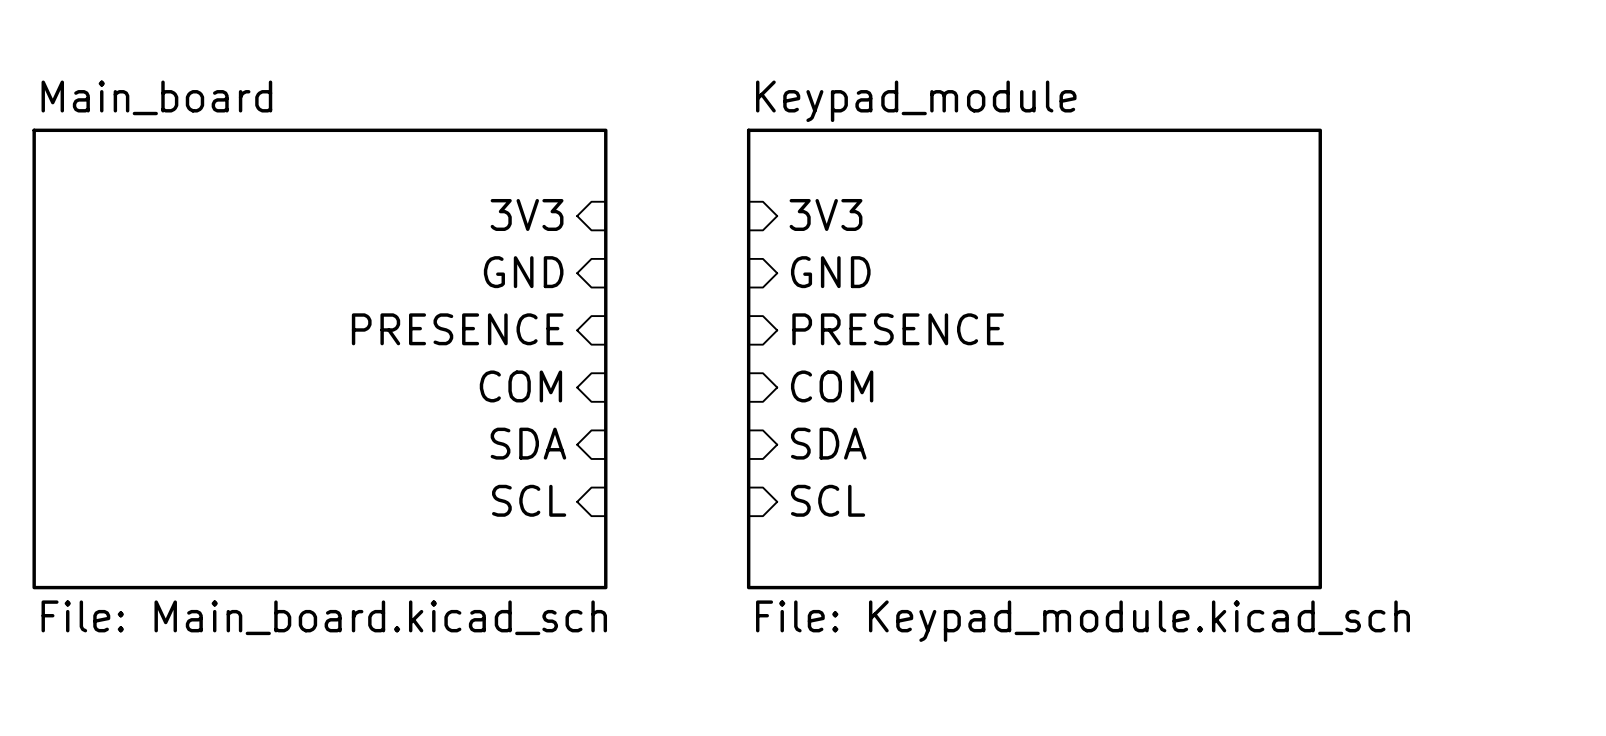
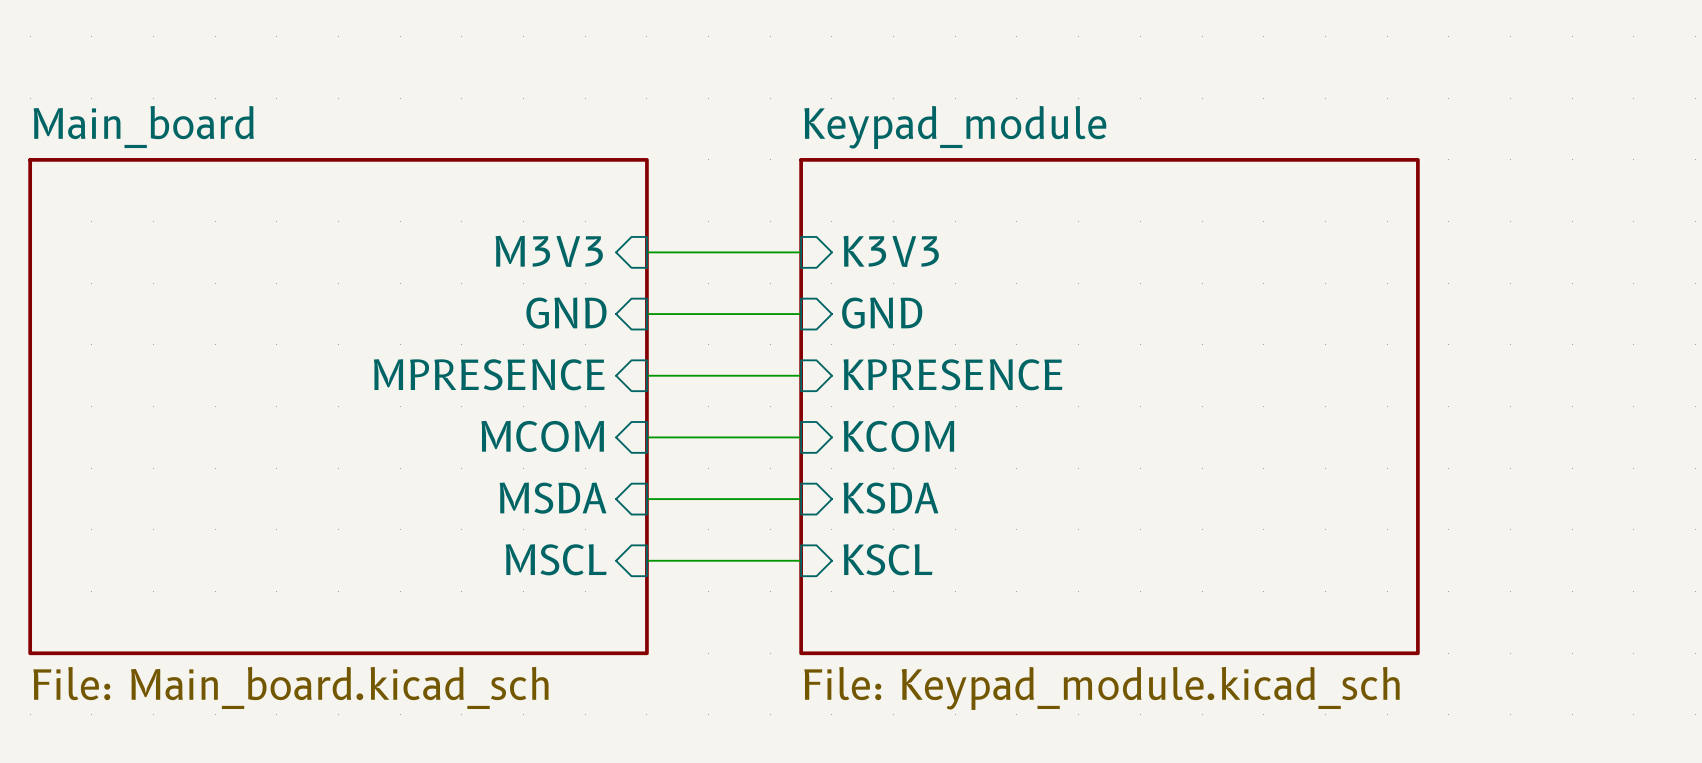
sheet pin: 3V3 (527, 214) -> M3V3 (549, 251)
sheet pin: 3V3 (826, 214) -> K3V3 (891, 251)
wire: none -> (646, 252) (801, 252)
wire: none -> (646, 314) (801, 314)
sheet pin: PRESENCE (457, 329) -> MPRESENCE (489, 374)
sheet pin: PRESENCE (898, 329) -> KPRESENCE (952, 374)
wire: none -> (646, 375) (801, 375)
sheet pin: COM (520, 386) -> MCOM (542, 436)
sheet pin: COM (832, 386) -> KCOM (898, 436)
wire: none -> (646, 437) (801, 437)
sheet pin: SDA (528, 443) -> MSDA (553, 498)
sheet pin: SDA (828, 443) -> KSDA (890, 498)
wire: none -> (646, 499) (801, 499)
sheet pin: SCL (529, 500) -> MSCL (556, 559)
sheet pin: SCL (828, 500) -> KSCL (887, 559)
wire: none -> (646, 560) (801, 560)

